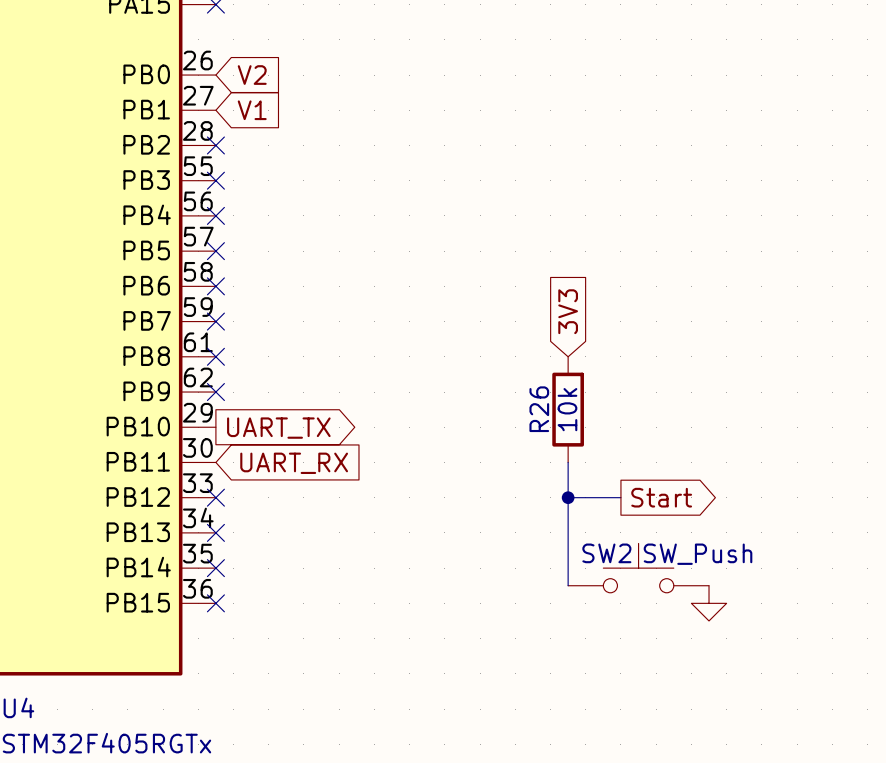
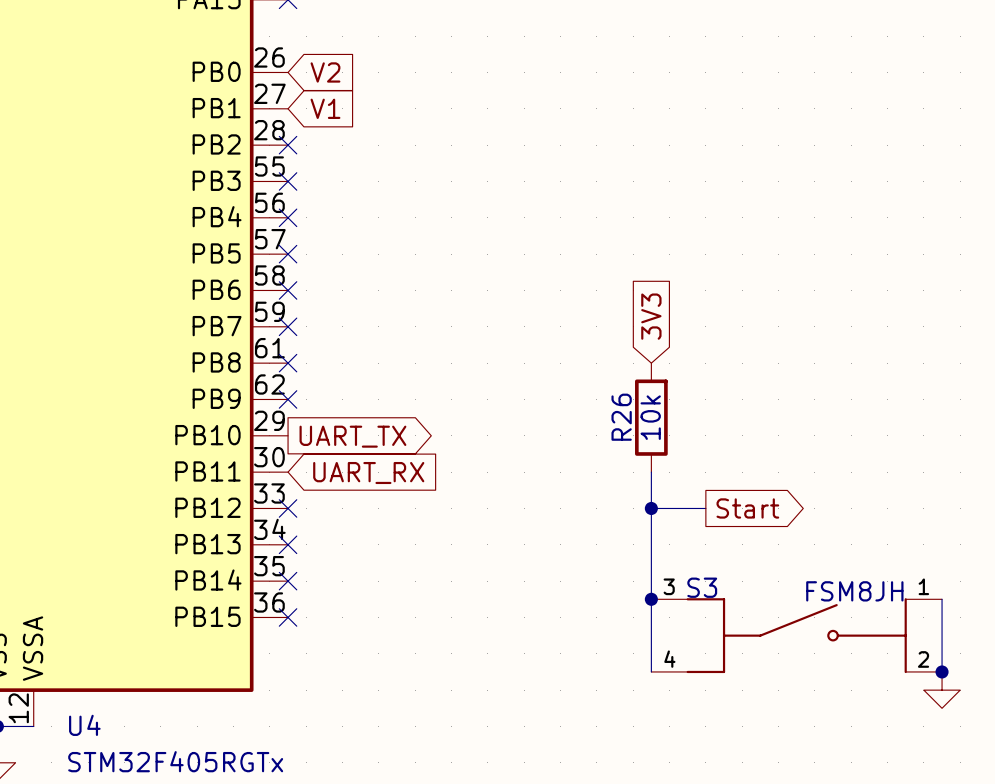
SW2: SW_Push (638, 568) -> none
wire: none -> (651, 599) (651, 671)
junction: none -> (651, 599)
wire: none -> (942, 599) (942, 671)
power symbol position: (709, 603) -> (942, 690)
S3: none -> FSM8JH (796, 635)
junction: none -> (942, 671)

